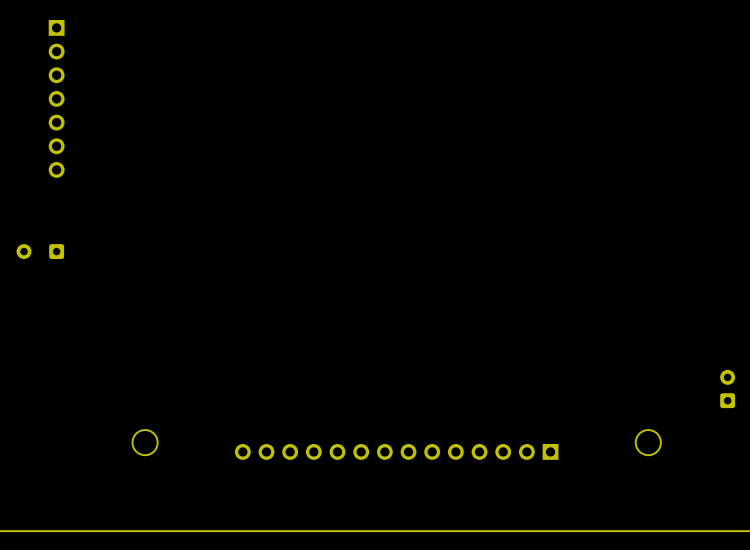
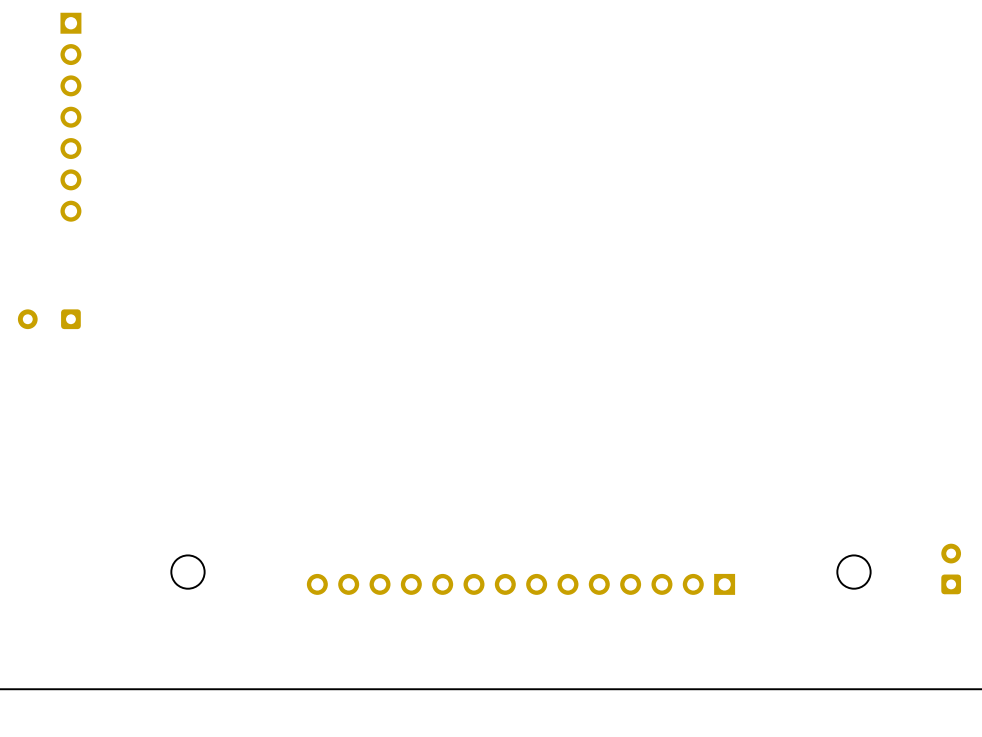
part position: (727, 389) -> (951, 568)

